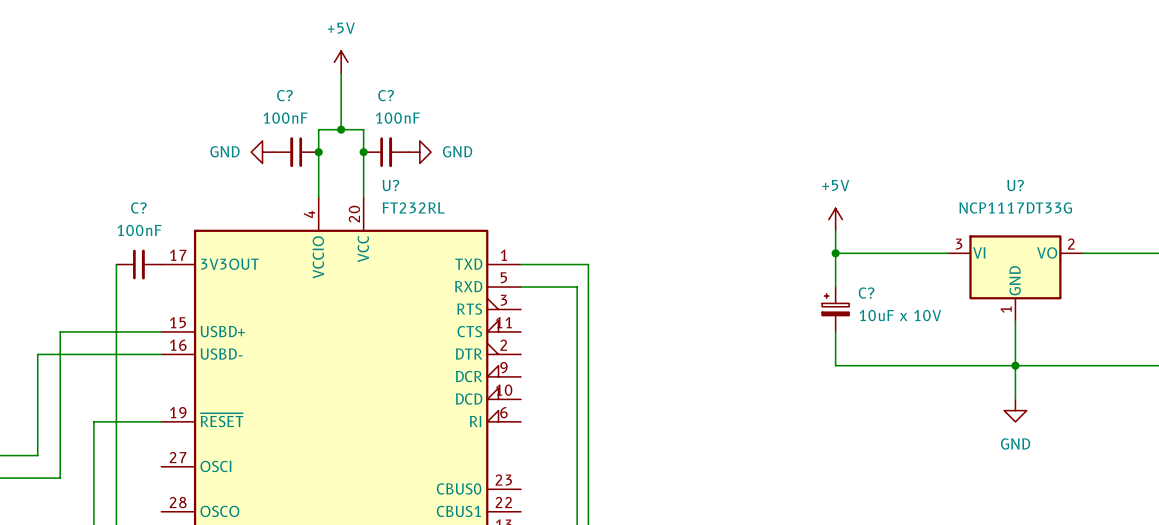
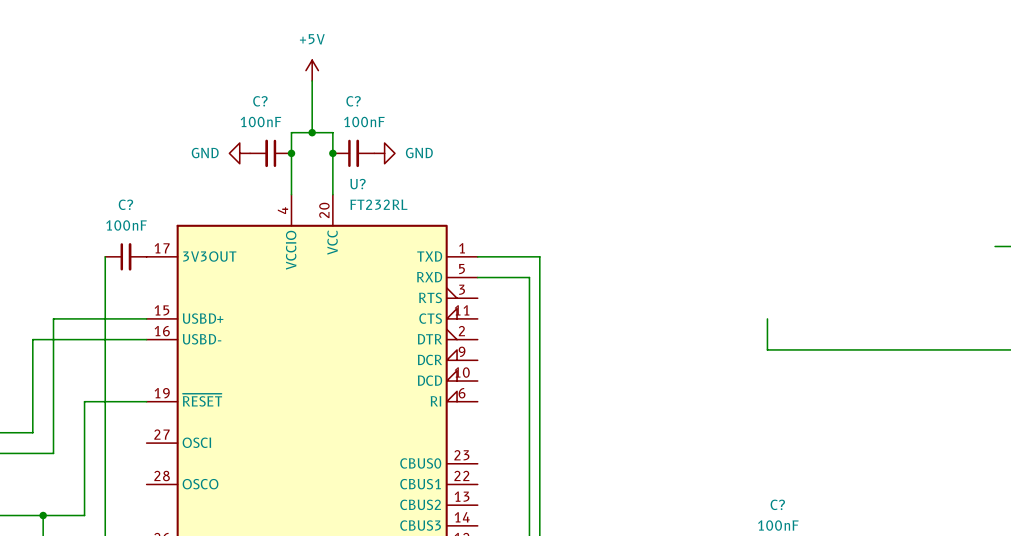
power symbol: +5V (835, 219) -> none
wire: (835, 230) (835, 287) -> none
wire: (835, 253) (948, 253) -> none
junction: (835, 253) -> none
U?: NCP1117DT33G (1015, 278) -> none
C?: 10uF x 10V (835, 309) -> none
wire: (1015, 320) (1015, 399) -> none
junction: (1015, 365) -> none
power symbol: GND (1015, 410) -> none

